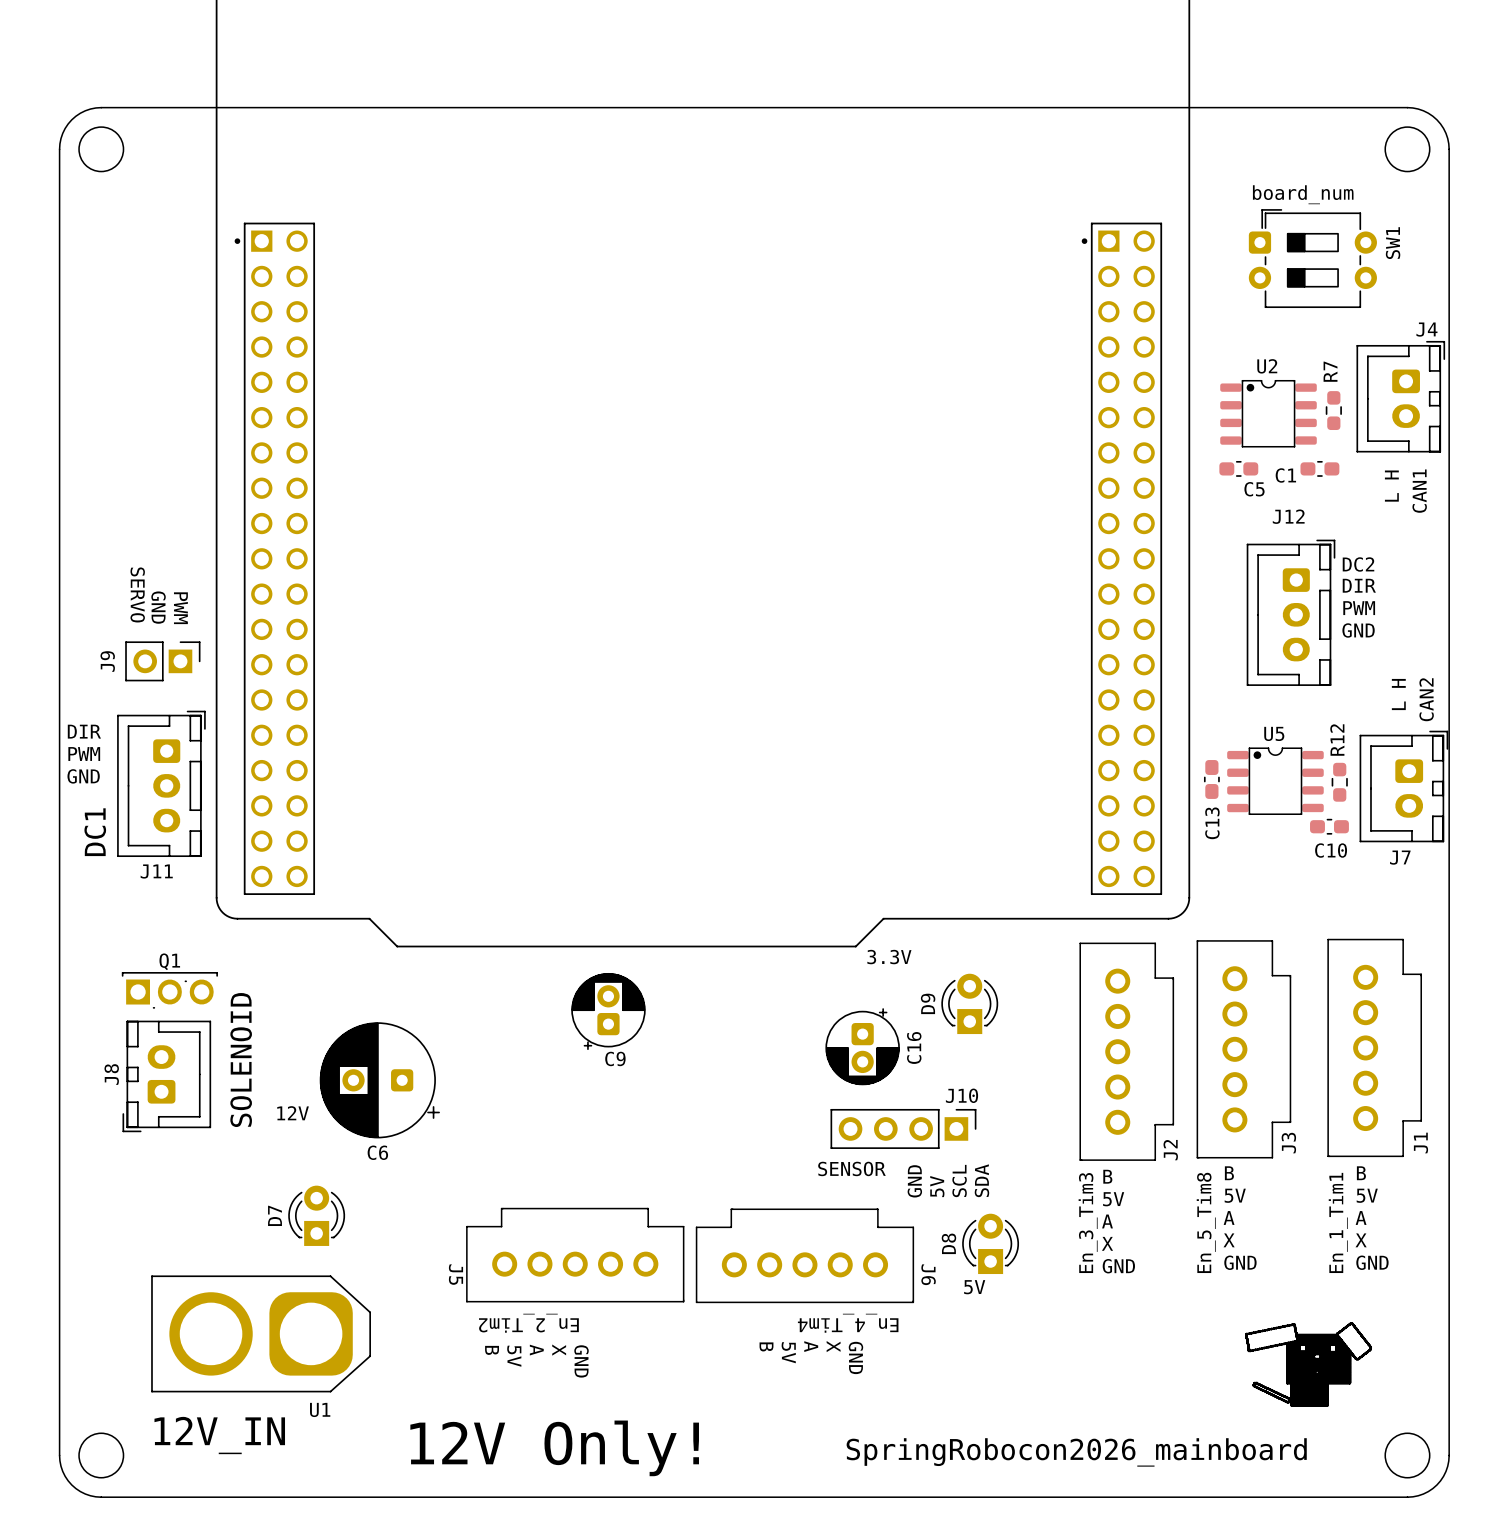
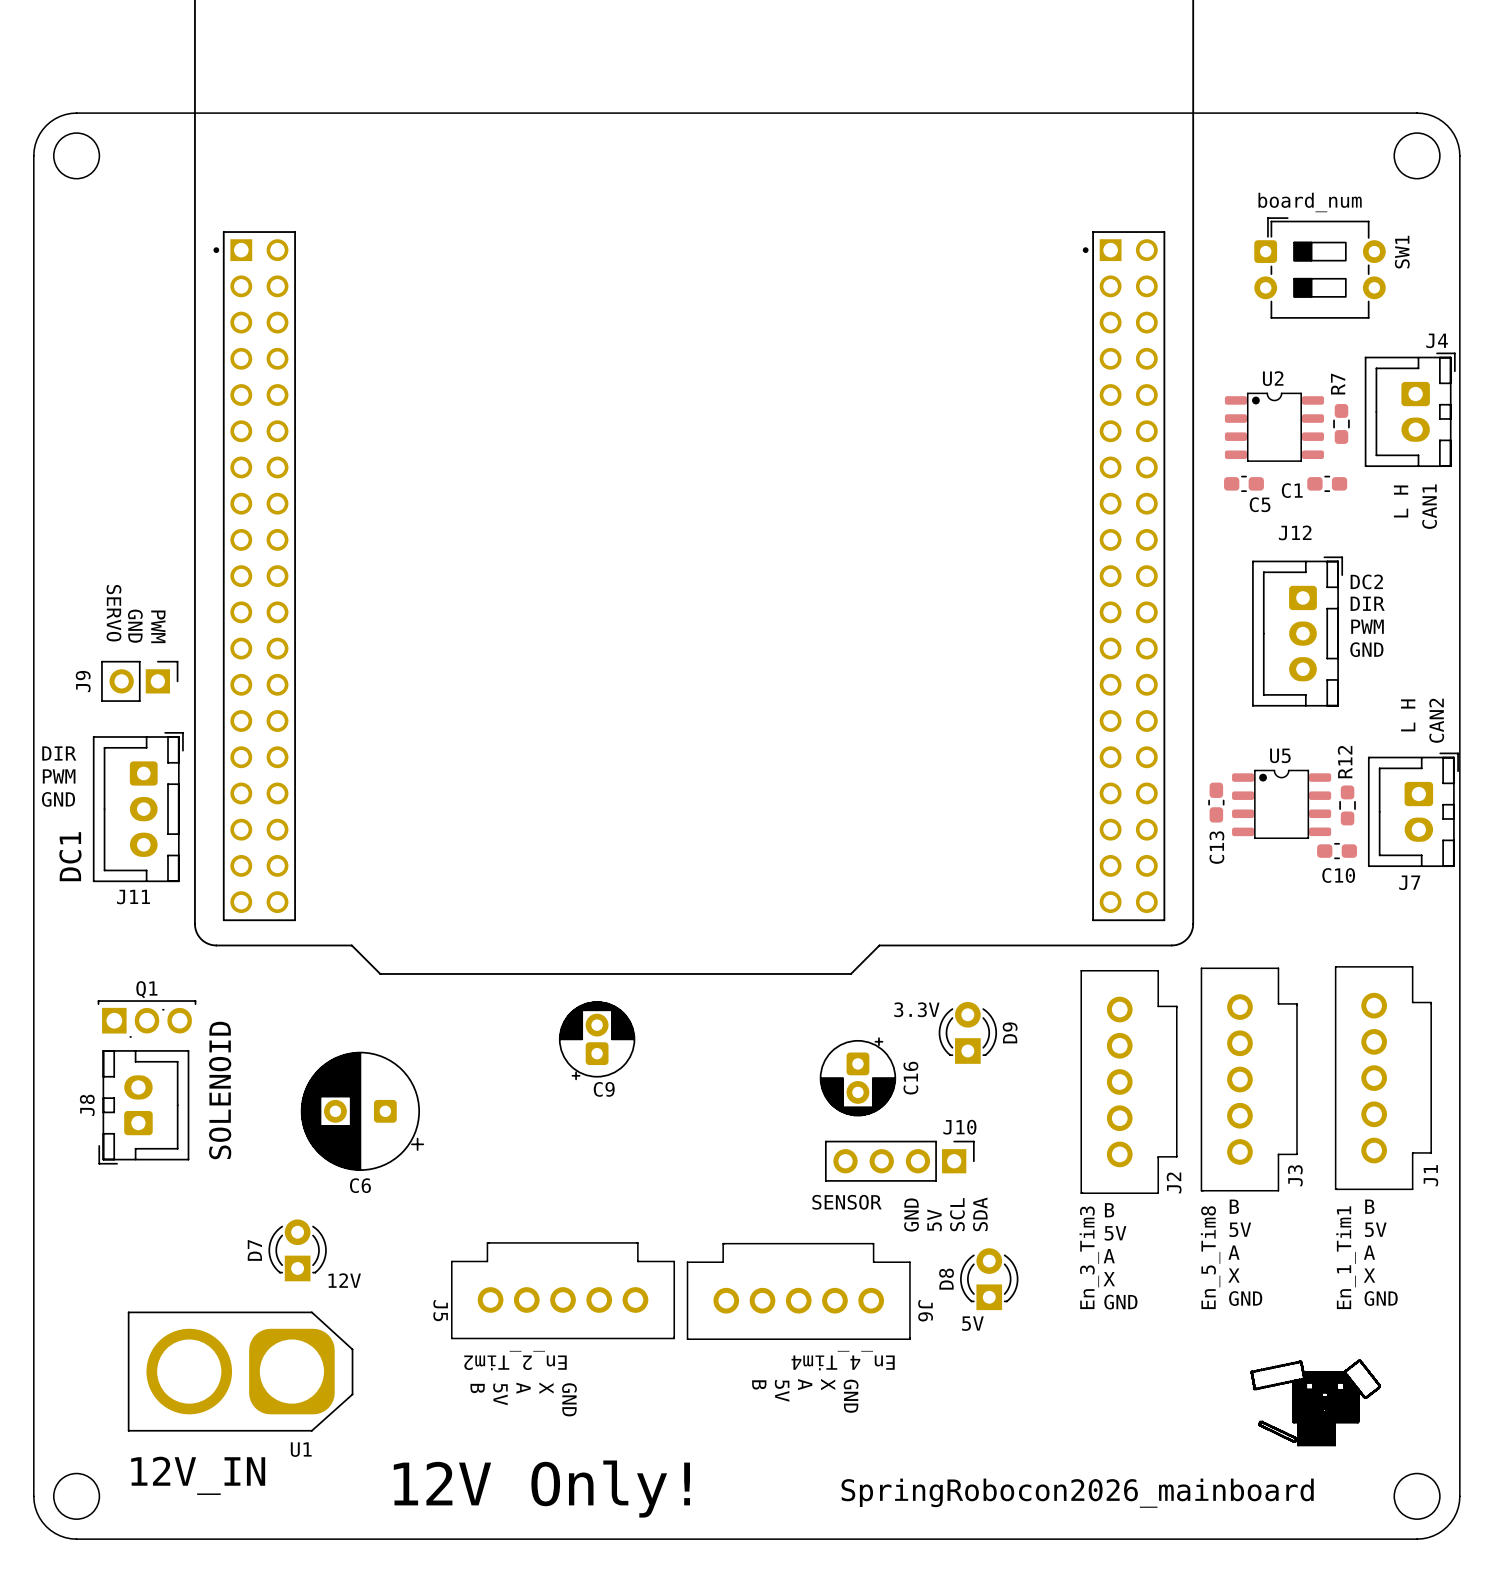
text position: 3.3V (889, 957) -> 3.3V (916, 1009)
D9 name position: D9 (928, 1003) -> D9 (1010, 1032)
text position: 12V (293, 1113) -> 12V (344, 1280)

